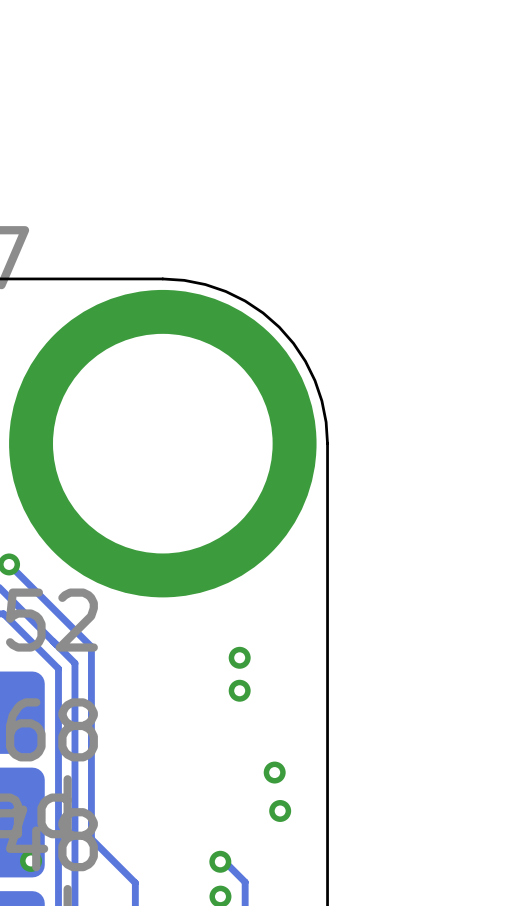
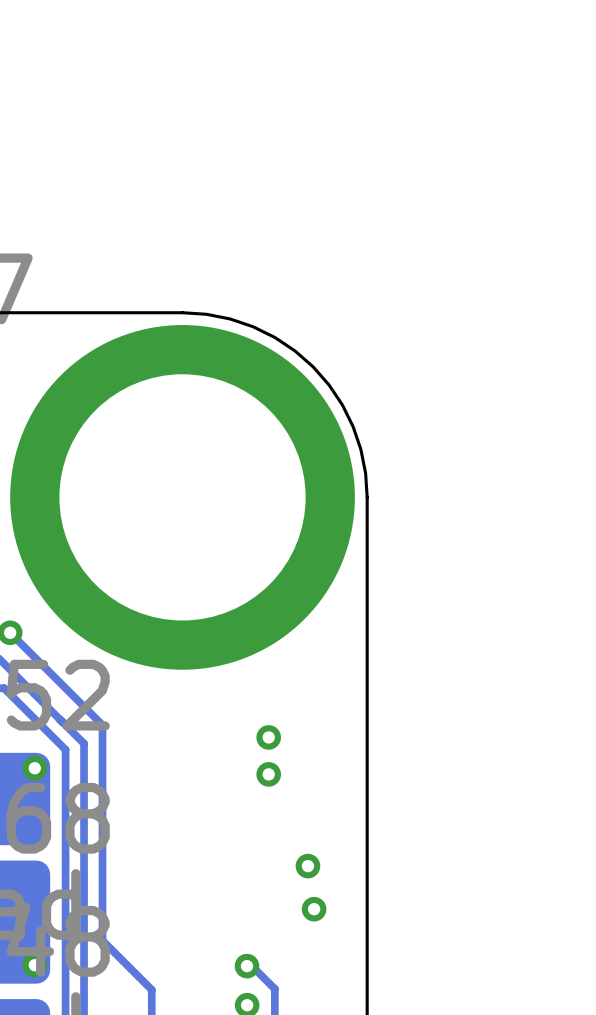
via: none -> (34, 768)

